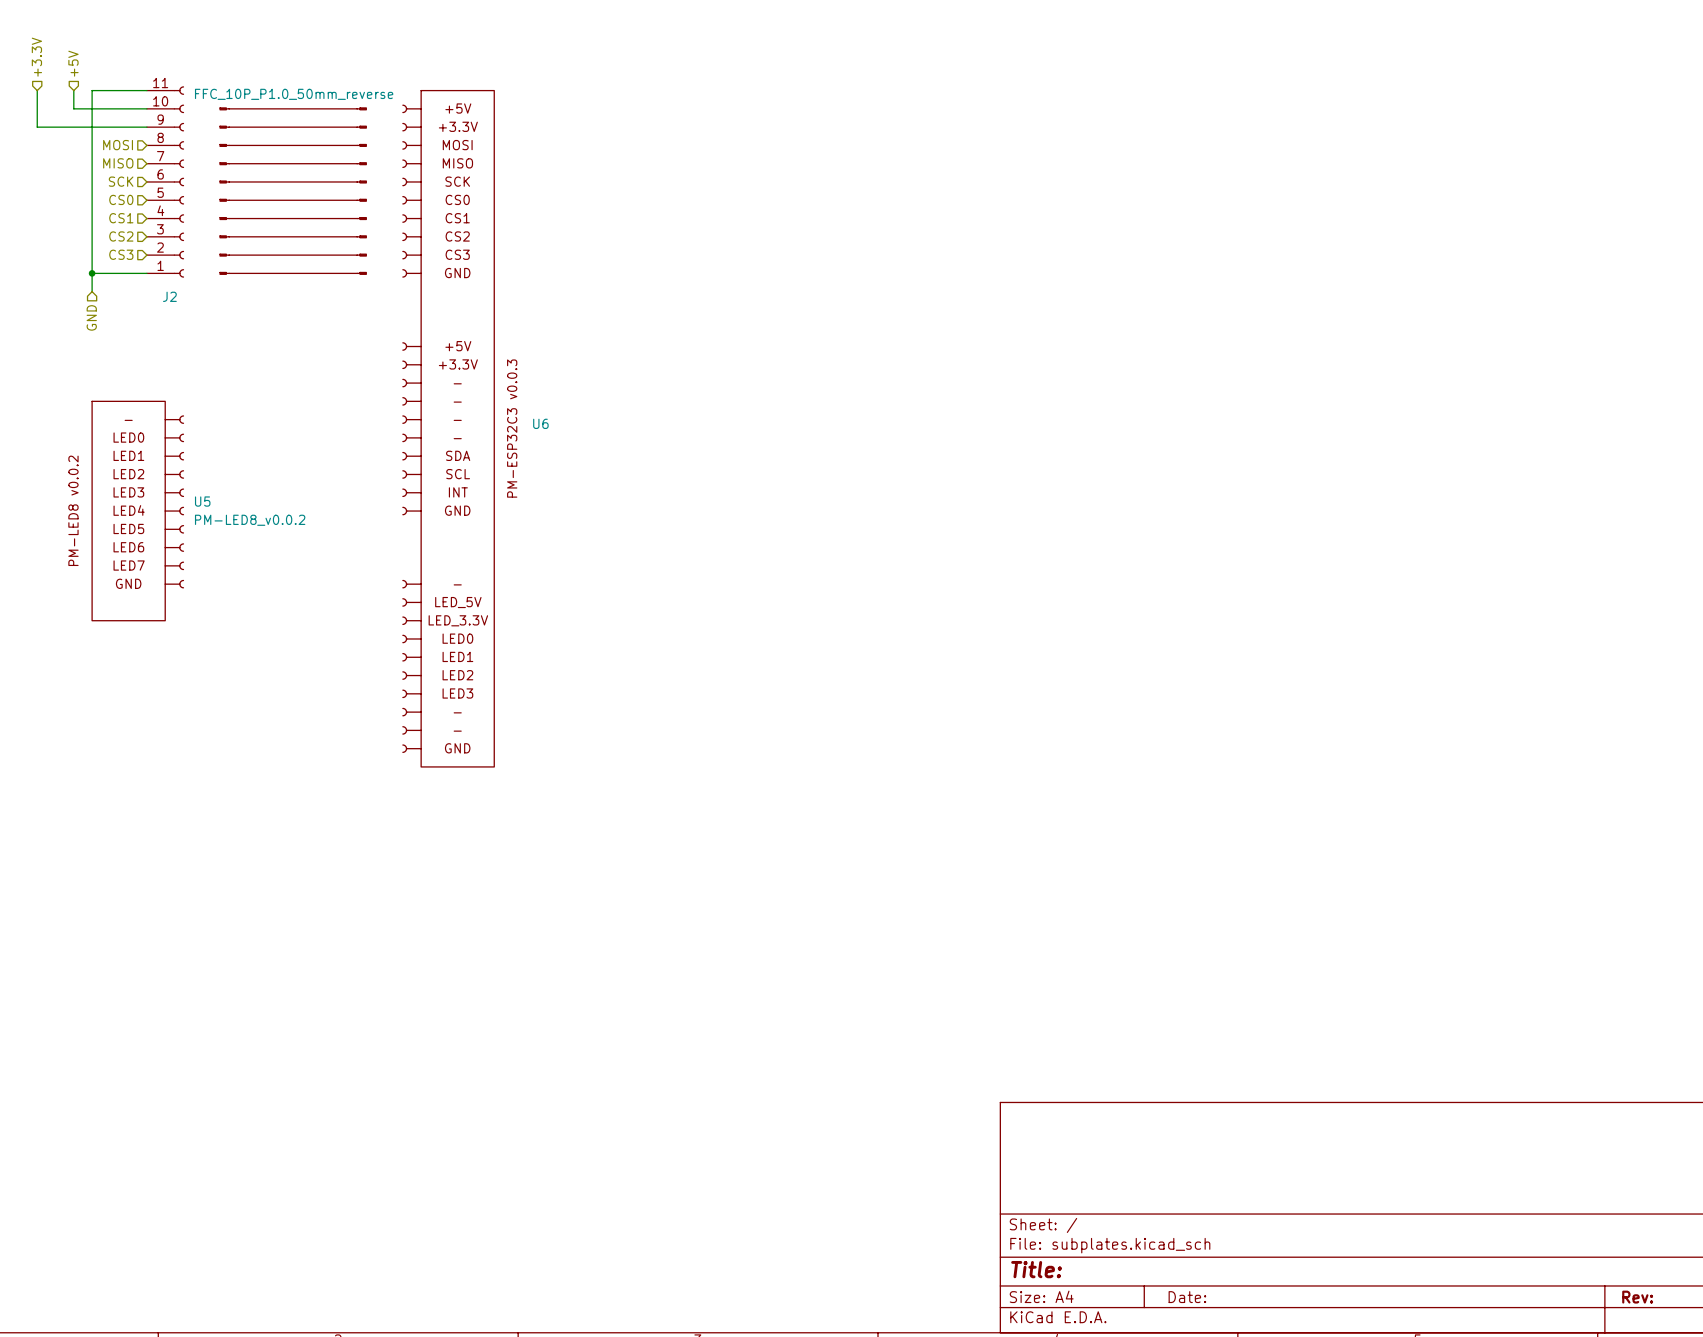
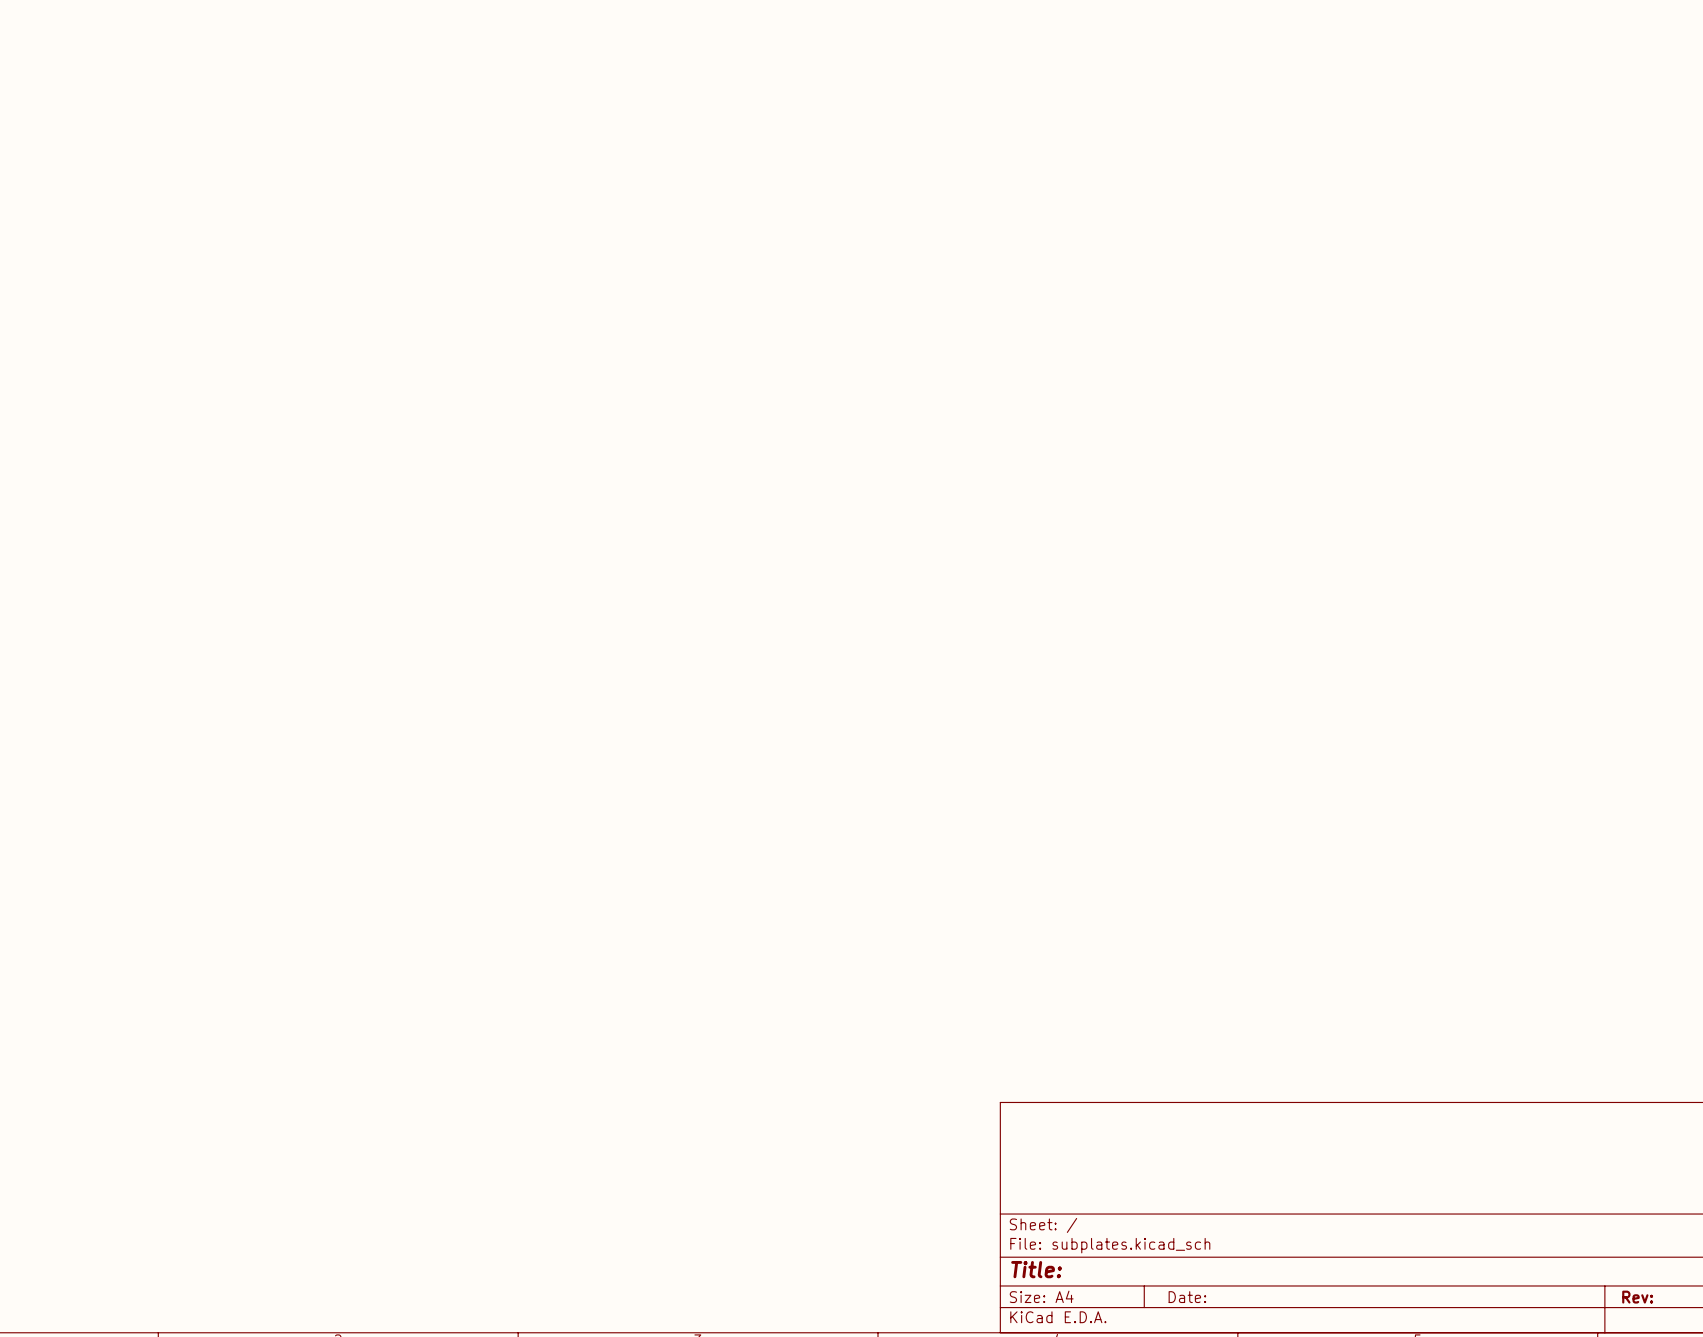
hierarchical label: +3.3V (36, 57) -> none
hierarchical label: +5V (73, 63) -> none
wire: (37, 90) (37, 127) (146, 127) -> none
wire: (73, 90) (73, 108) (146, 108) -> none
wire: (146, 90) (92, 90) (92, 291) -> none
hierarchical label: MOSI (118, 145) -> none
hierarchical label: MISO (118, 163) -> none
hierarchical label: SCK (121, 181) -> none
J2: (165, 181) -> none
part: FFC_10P_P1.0_50mm_reverse (293, 191) -> none
hierarchical label: CS0 (121, 199) -> none
hierarchical label: CS1 (121, 218) -> none
hierarchical label: CS2 (121, 236) -> none
hierarchical label: CS3 (121, 254) -> none
wire: (92, 273) (146, 273) -> none
junction: (92, 273) -> none
hierarchical label: GND (91, 317) -> none
U6: (448, 428) -> none
U5: PM-LED8_v0.0.2 (138, 511) -> none

